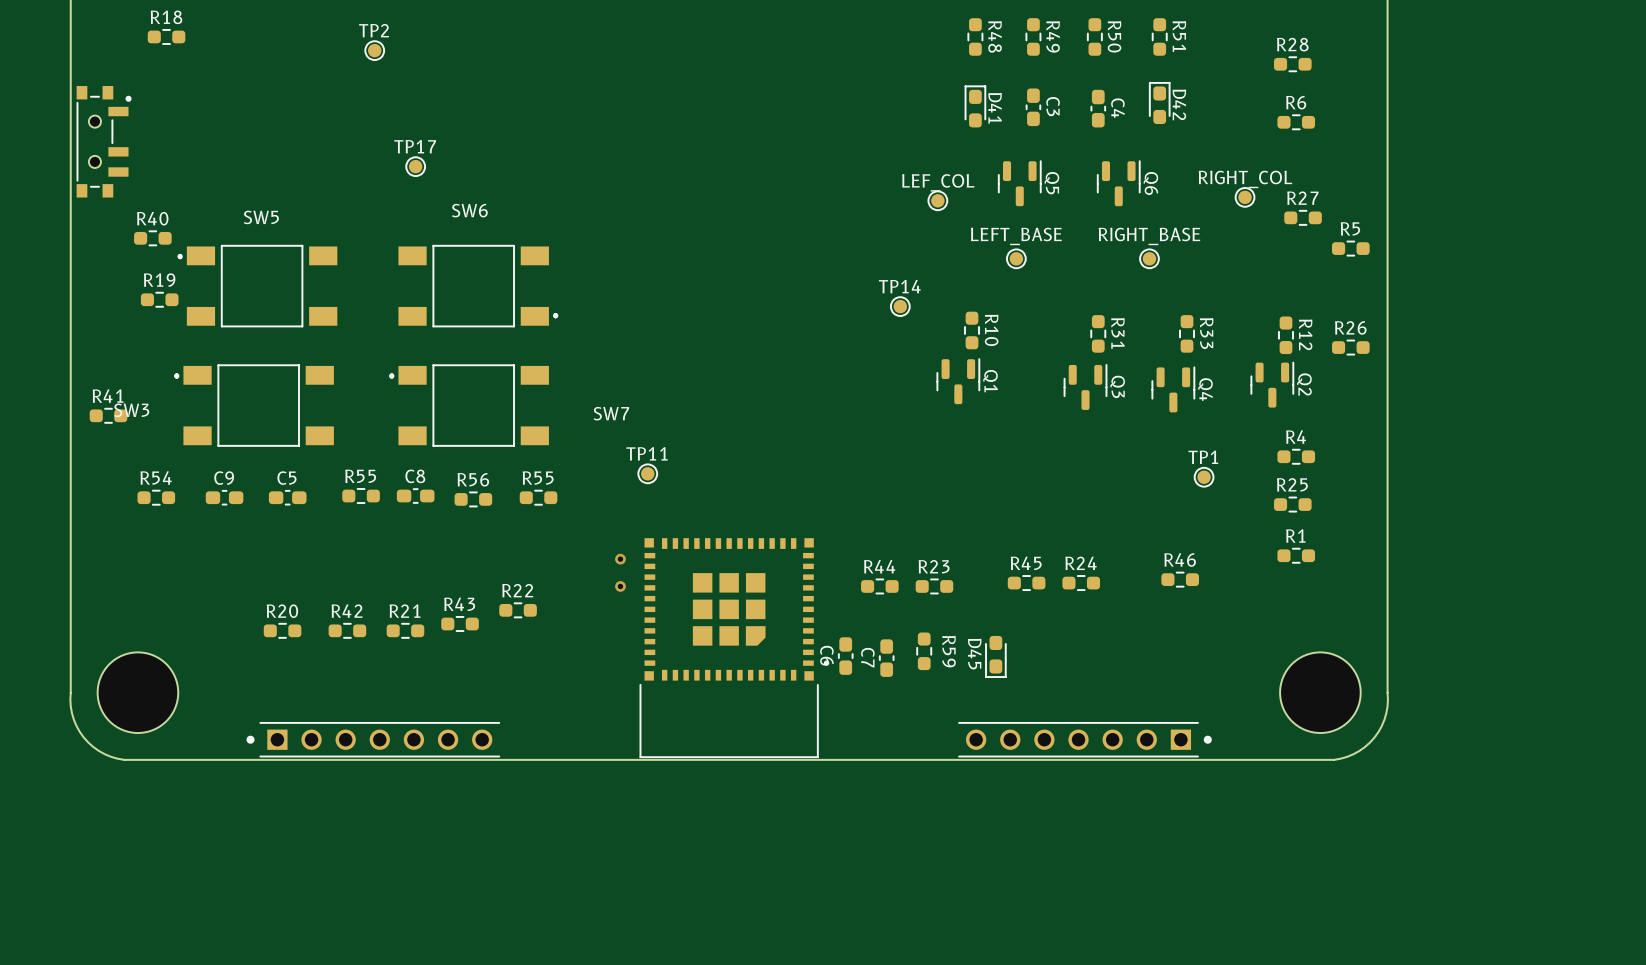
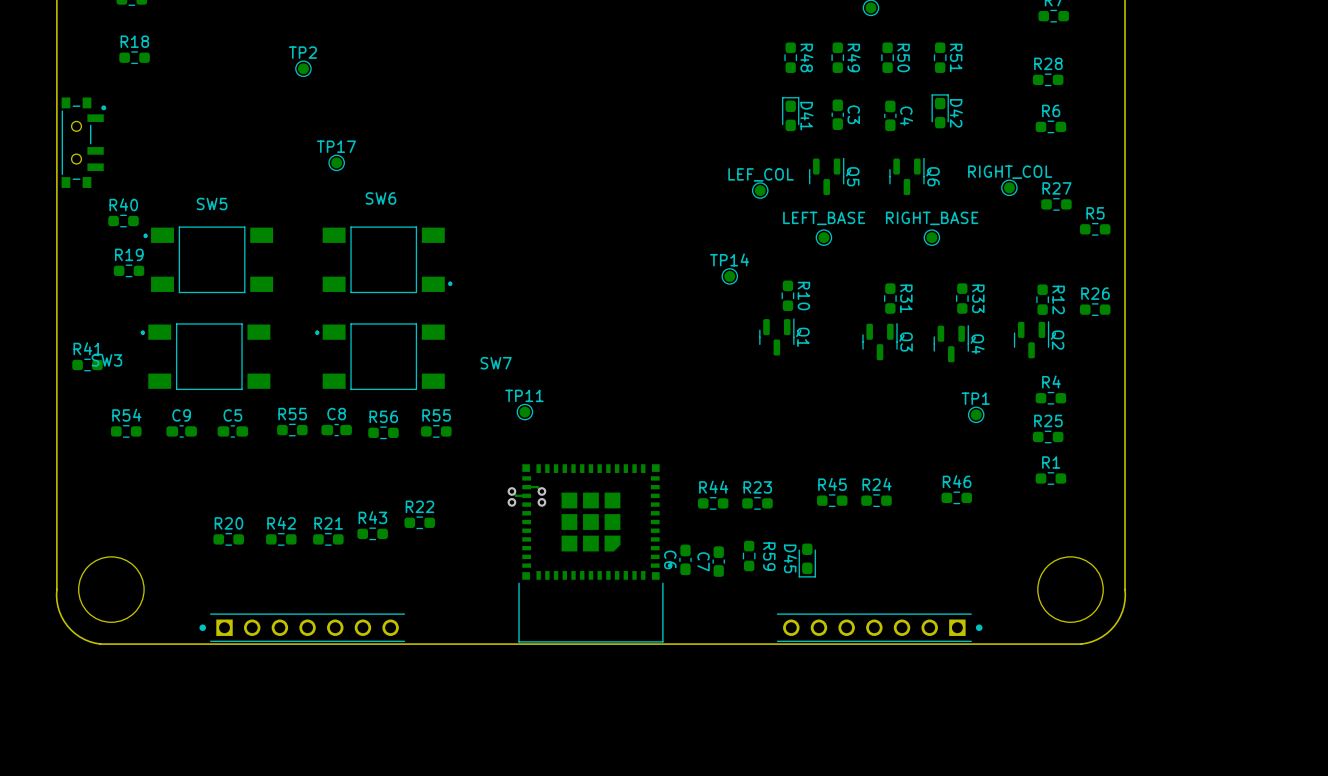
via: (620, 559) -> none
track: none -> (526, 487) (537, 487) (541, 491)
track: none -> (511, 491) (516, 495) (526, 495)
via: none -> (511, 491)
via: none -> (541, 491)
via: none -> (511, 502)
via: none -> (541, 502)
via: (620, 586) -> none

